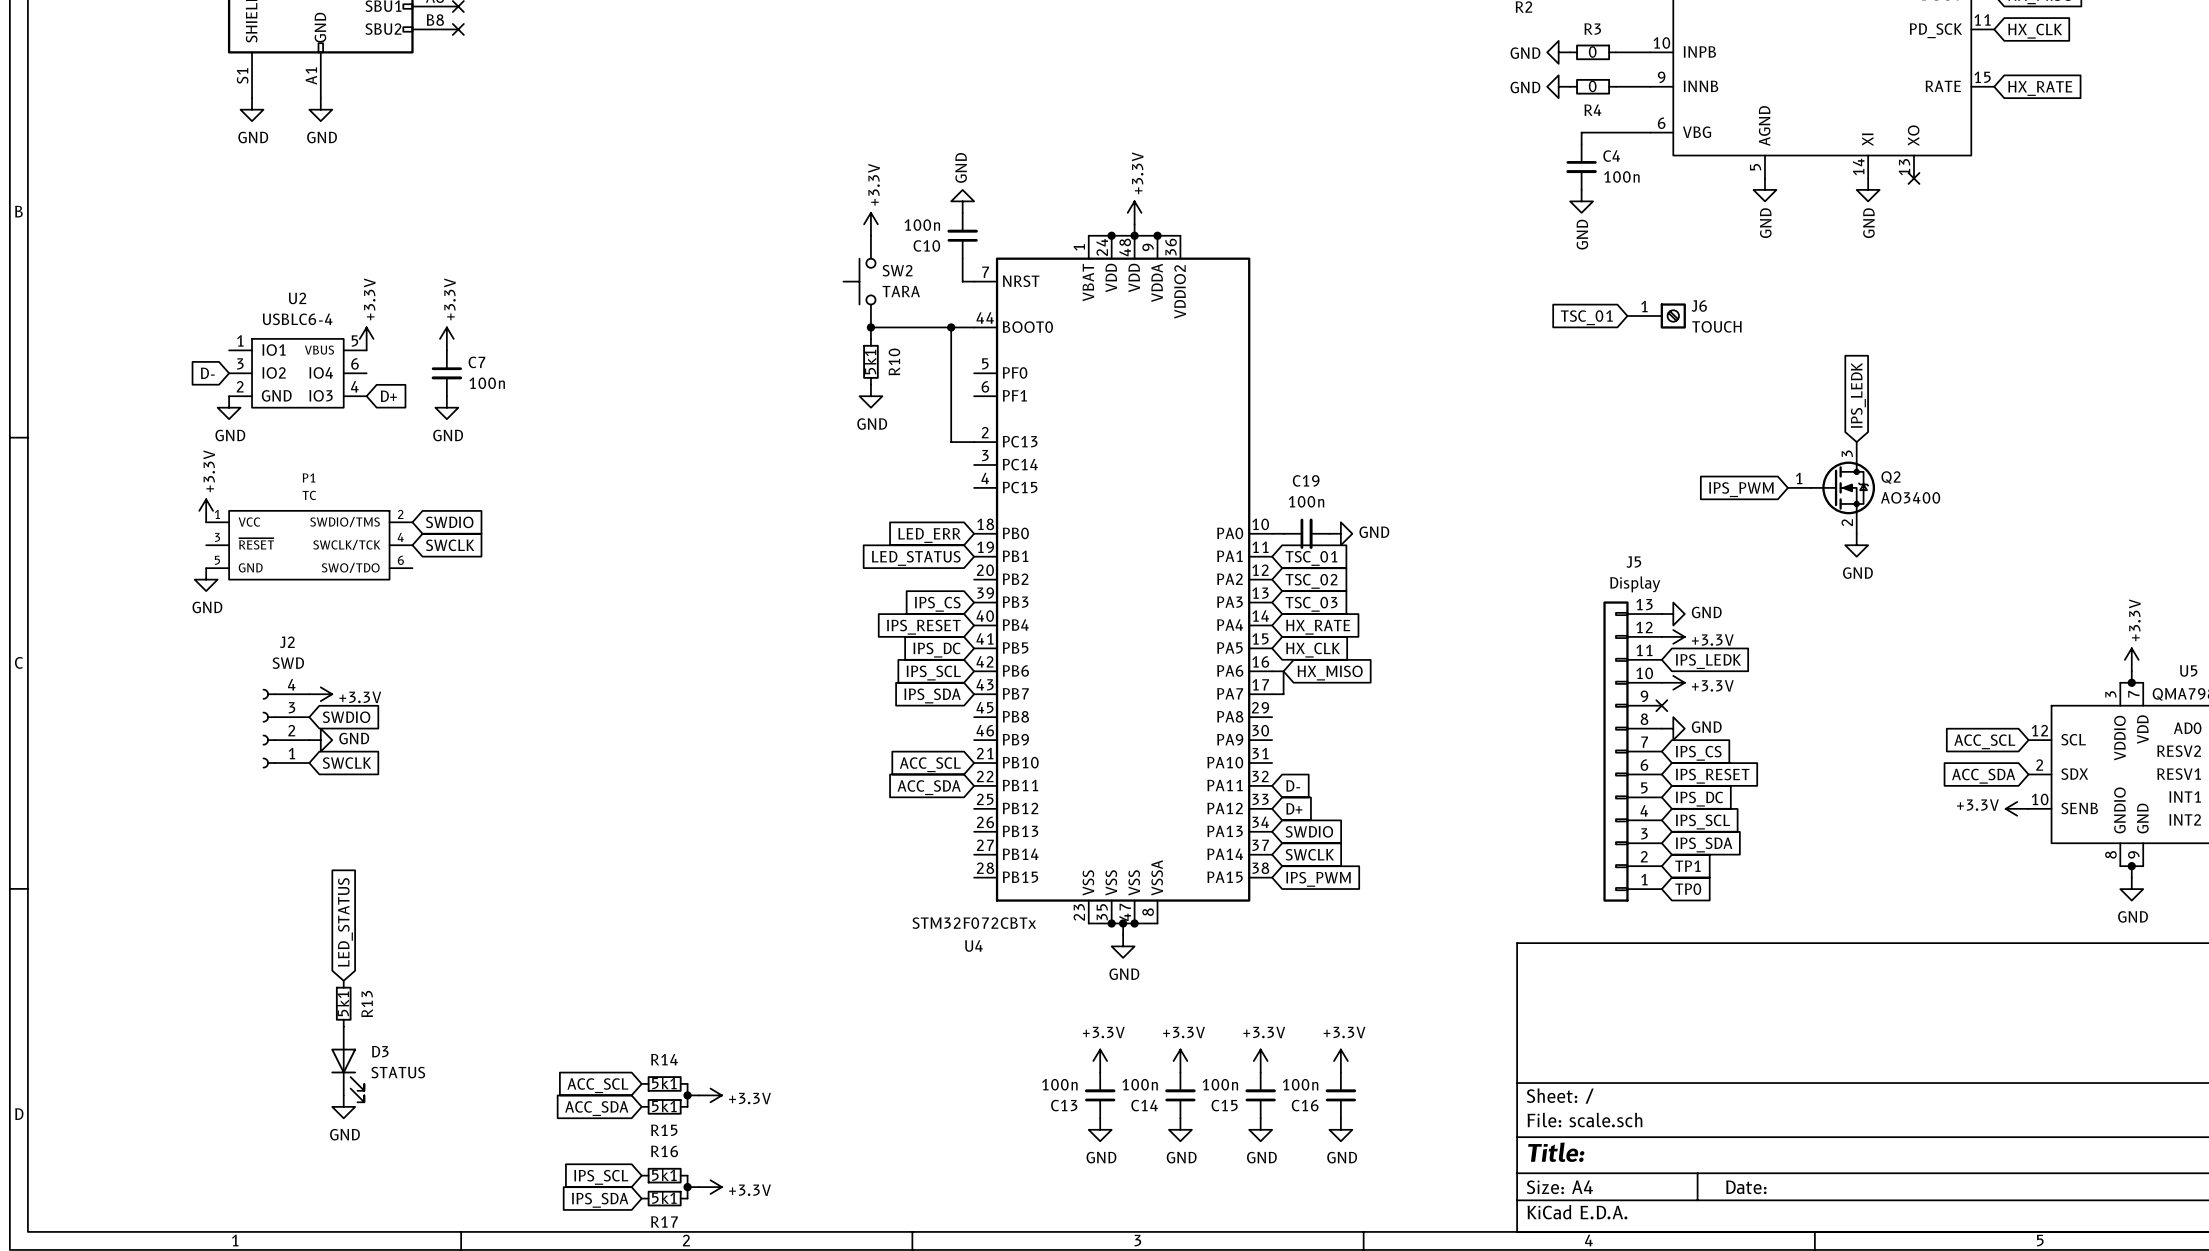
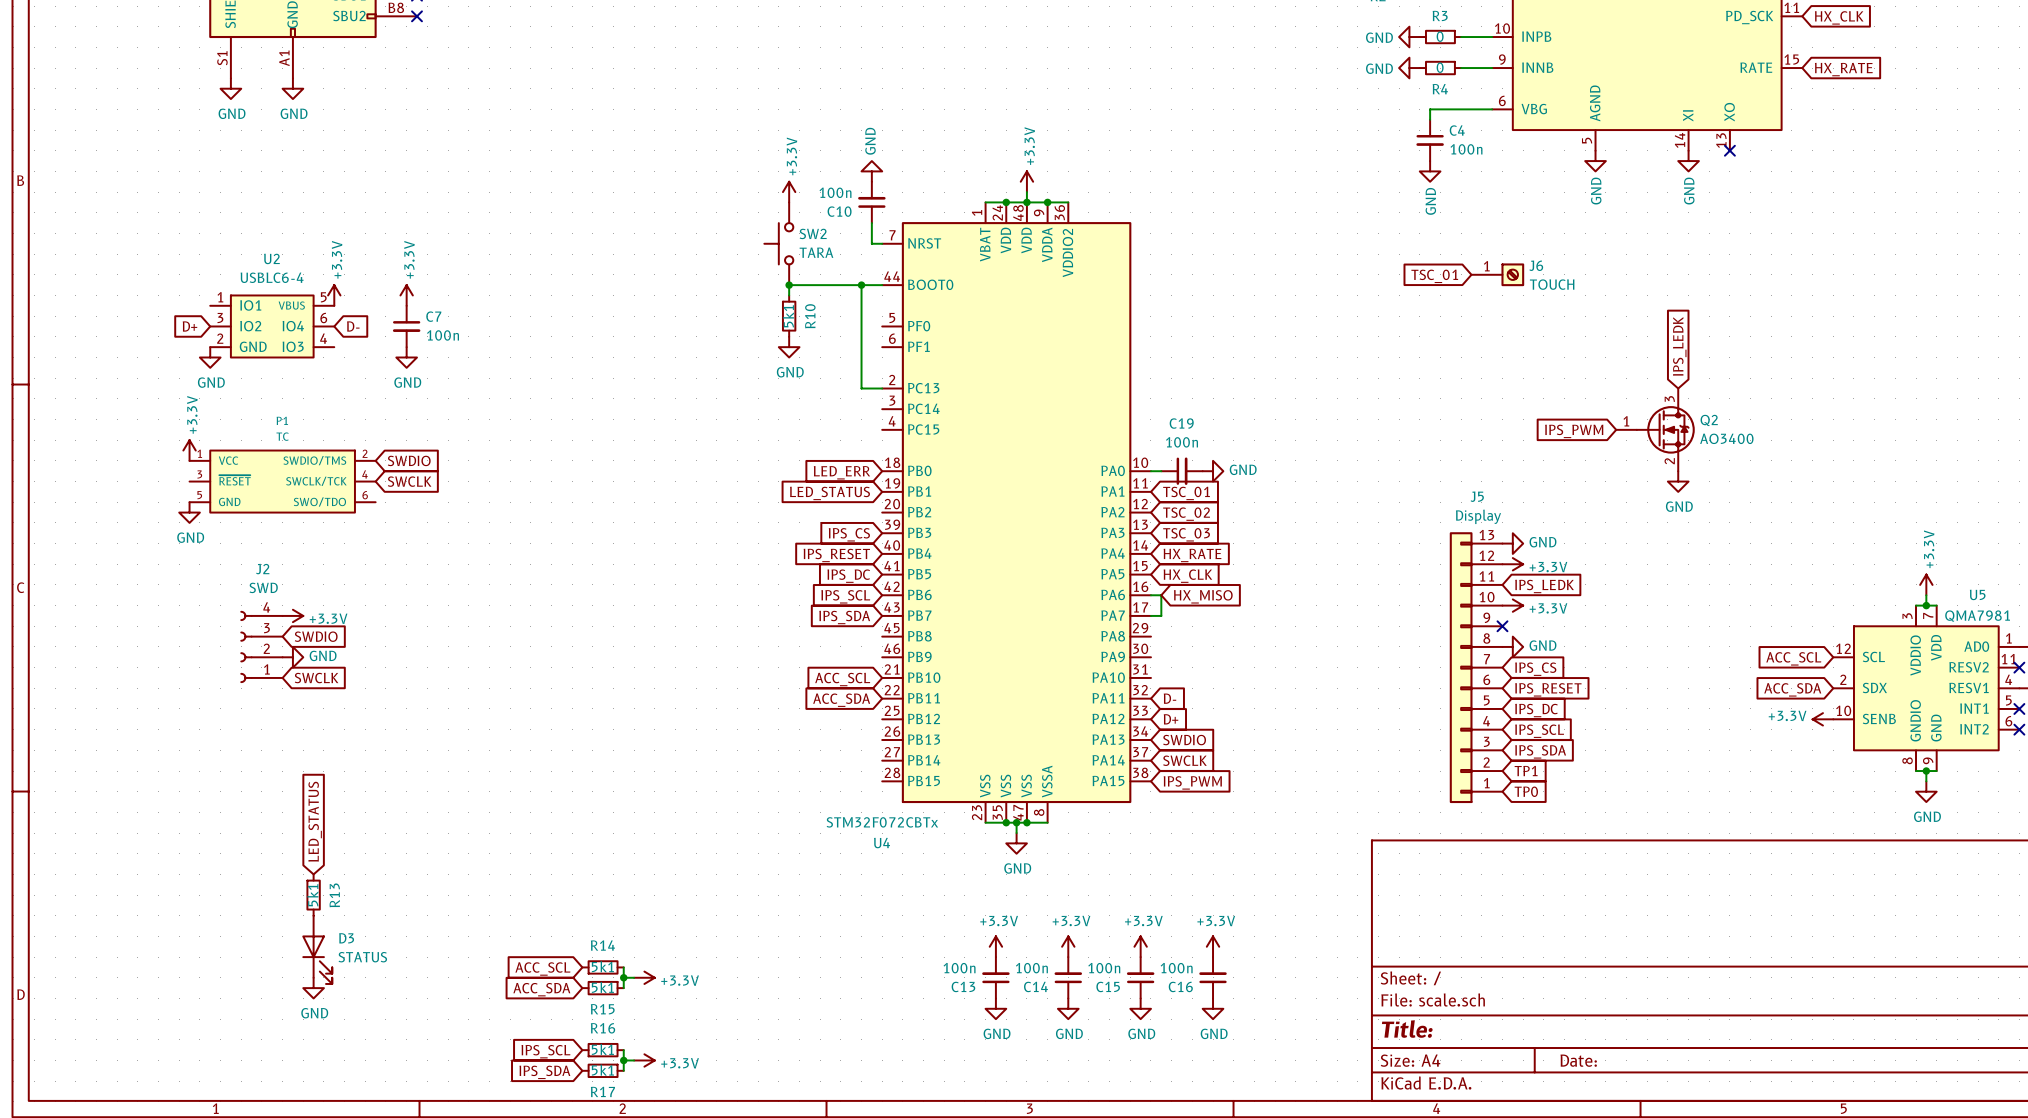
global label: D- (207, 373) -> D+ (189, 326)
global label: none -> D- (353, 326)
global label: D+ (388, 396) -> none

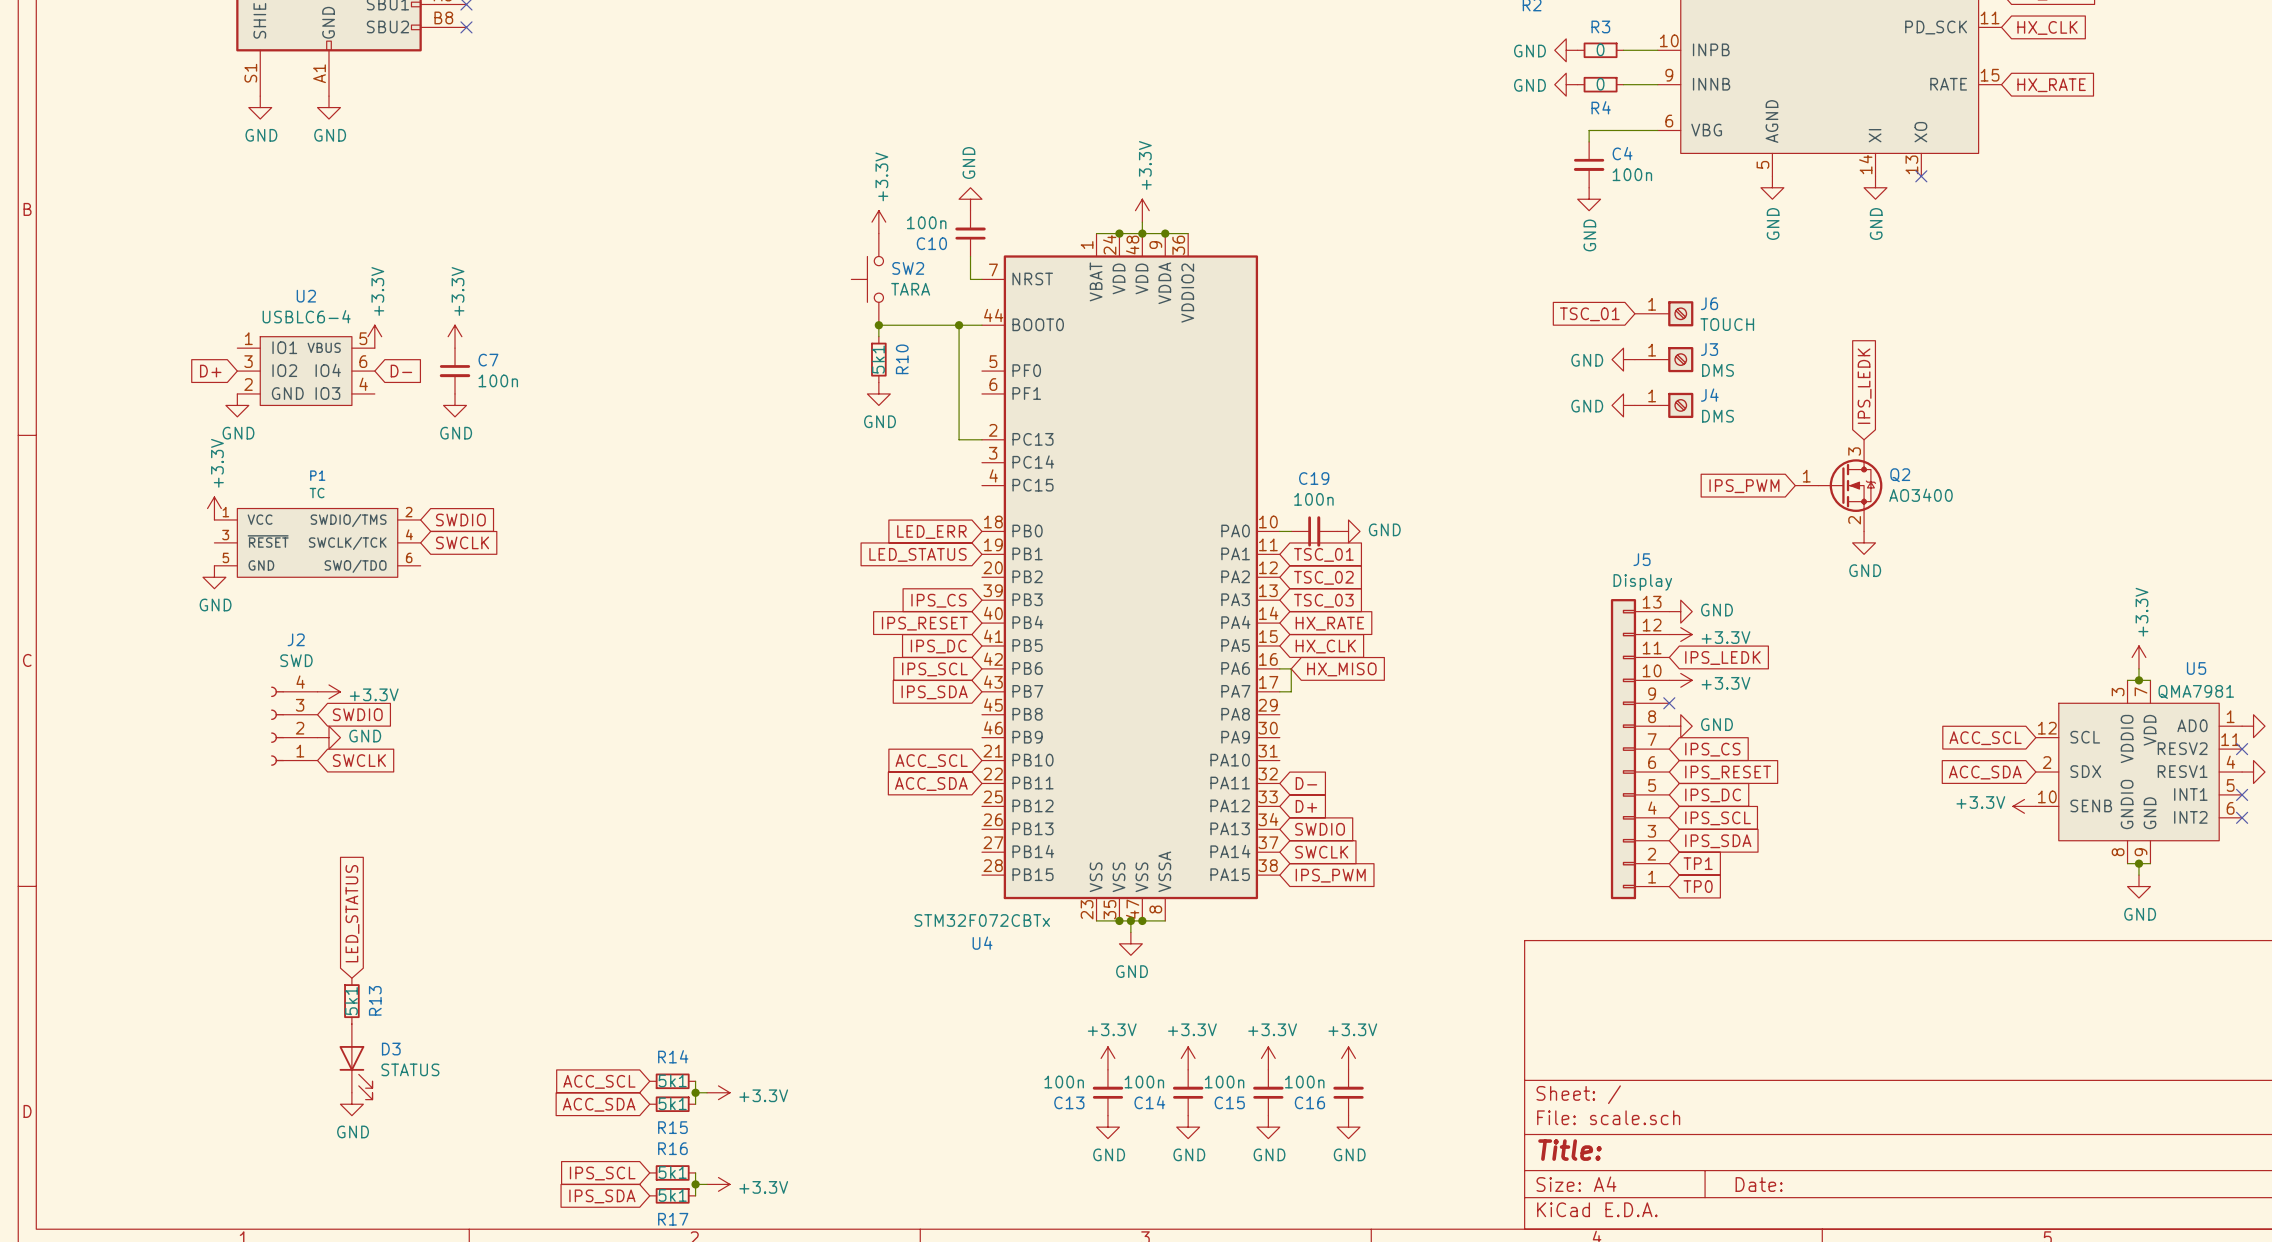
power symbol: none -> GND (1623, 359)
J3: none -> DMS (1664, 359)
power symbol: none -> GND (1623, 405)
J4: none -> DMS (1664, 405)

